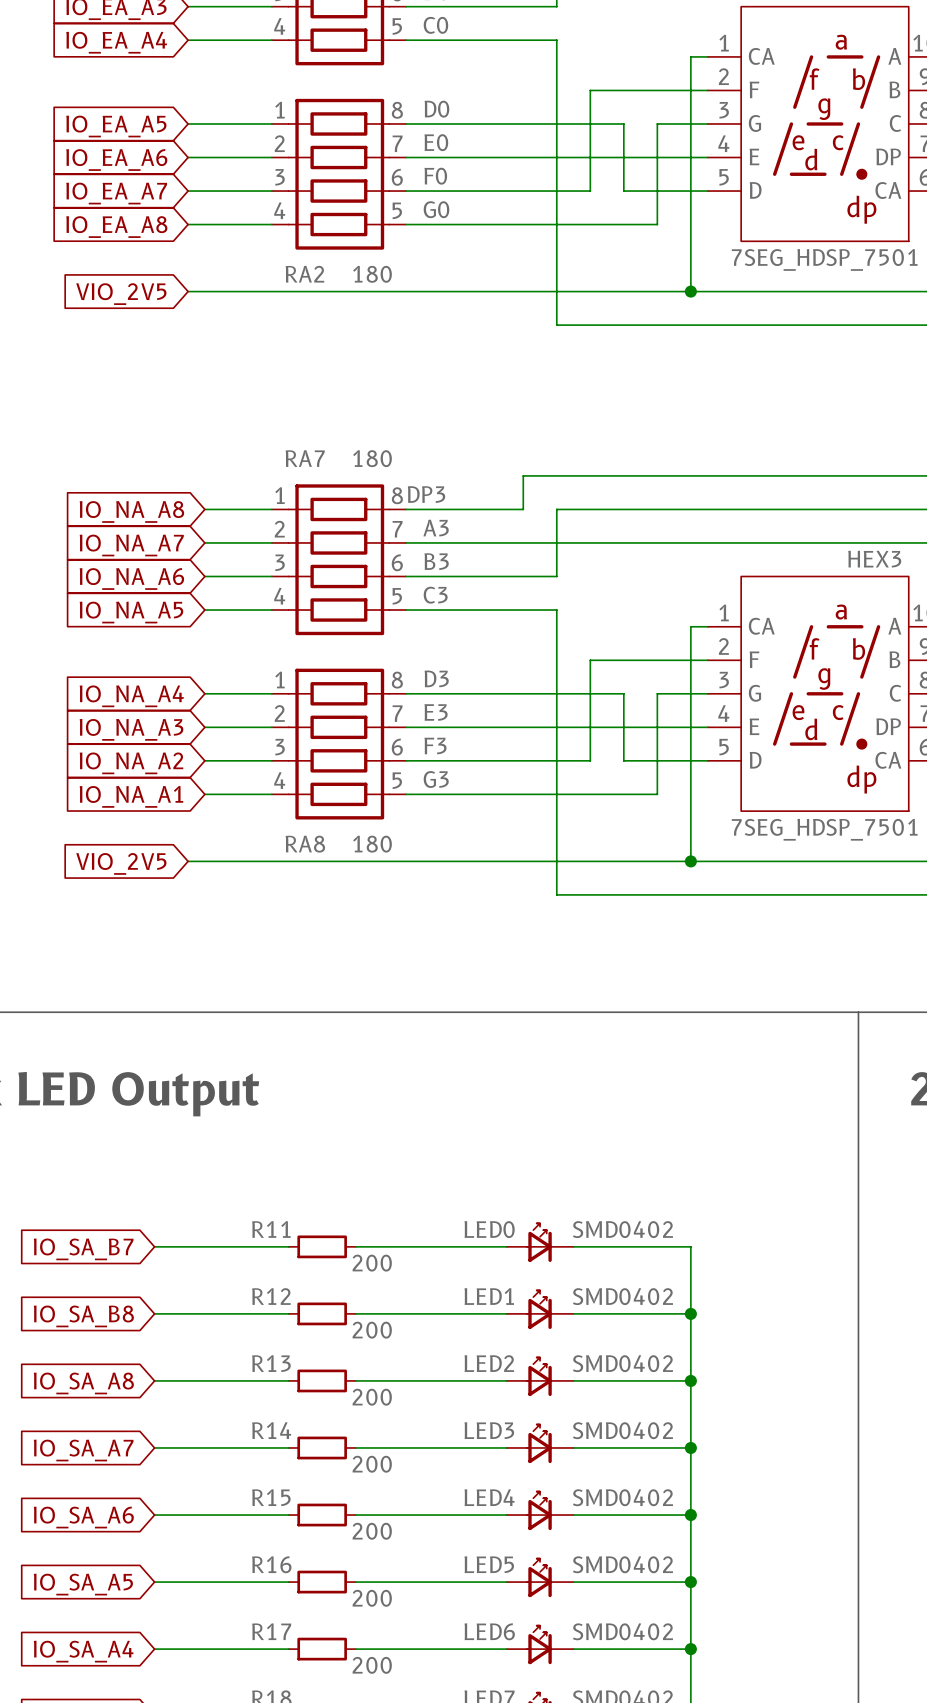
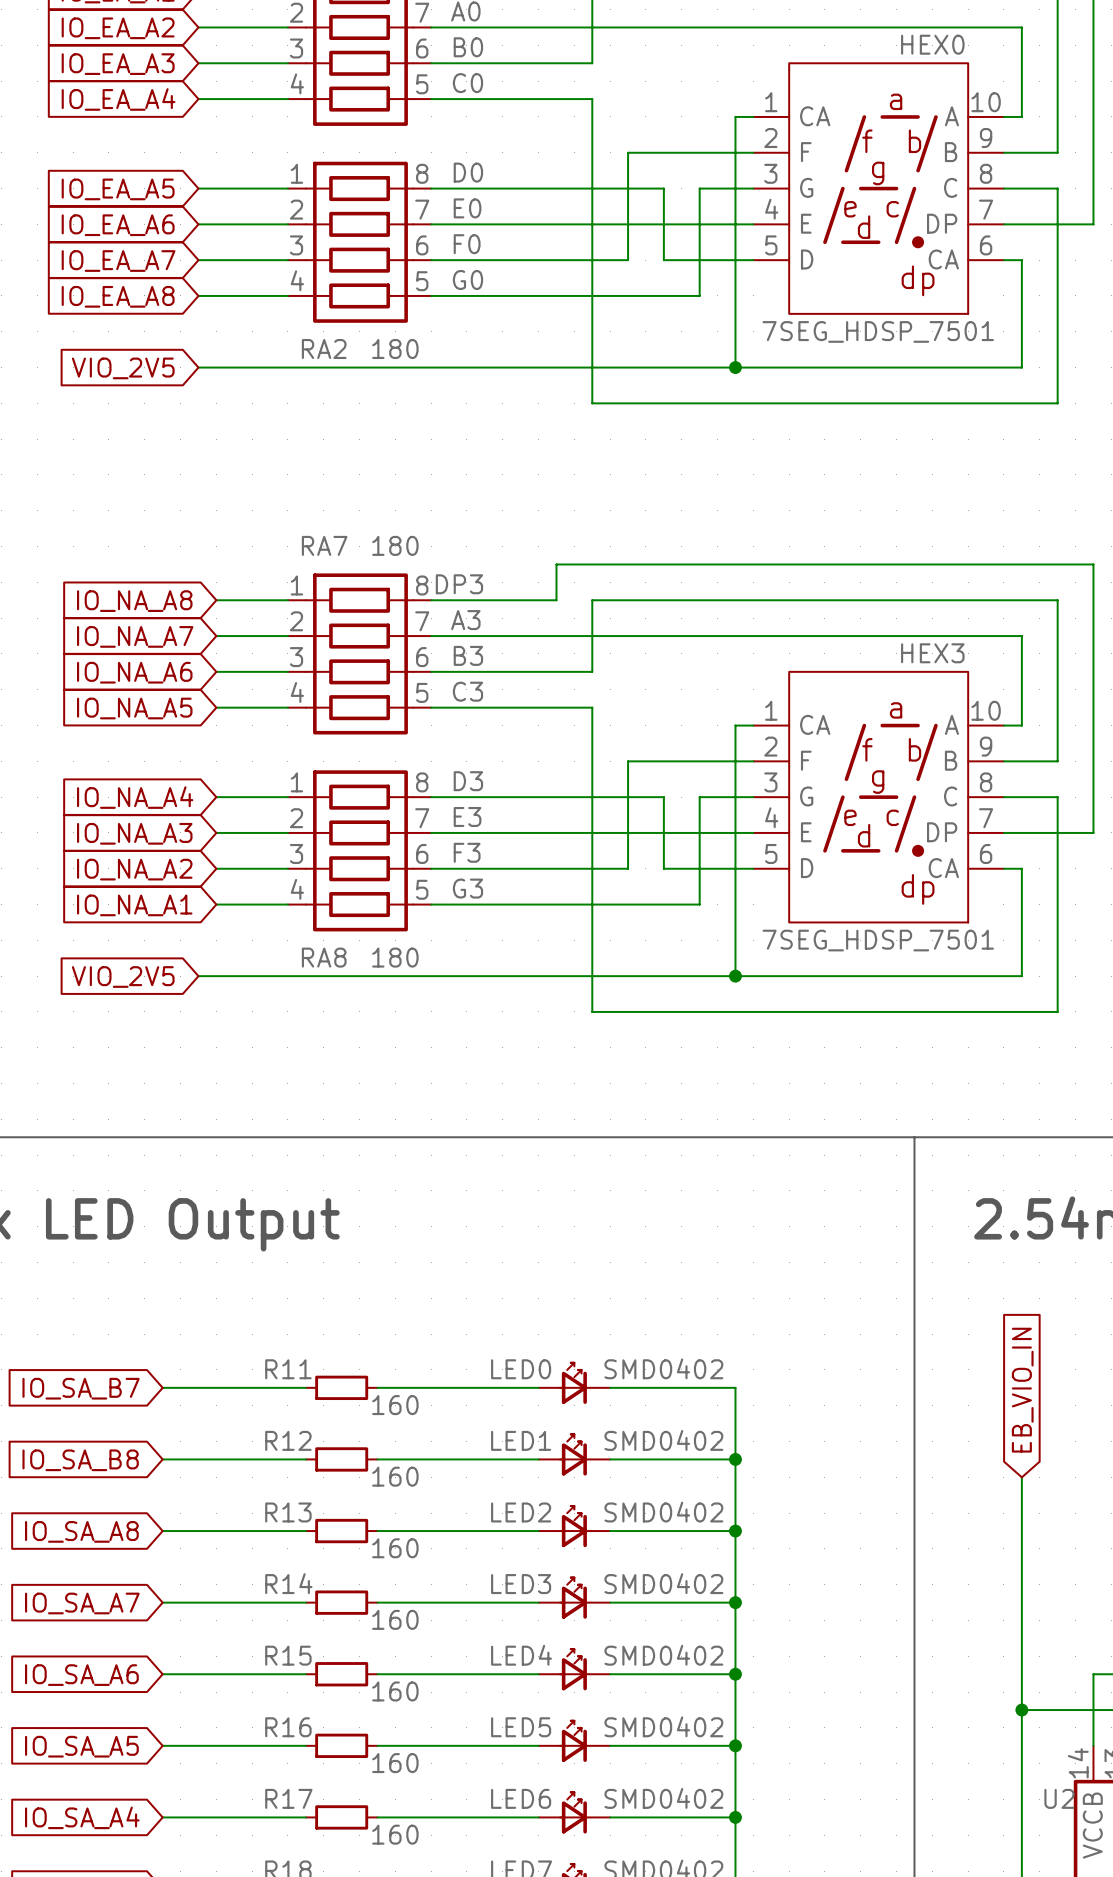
R11 value: 200 (372, 1263) -> 160 (395, 1405)
R12 value: 200 (372, 1330) -> 160 (395, 1476)
R13 value: 200 (372, 1397) -> 160 (395, 1548)
R14 value: 200 (372, 1464) -> 160 (395, 1619)
R15 value: 200 (372, 1531) -> 160 (395, 1691)
R16 value: 200 (372, 1598) -> 160 (395, 1763)
R17 value: 200 (372, 1665) -> 160 (395, 1834)

